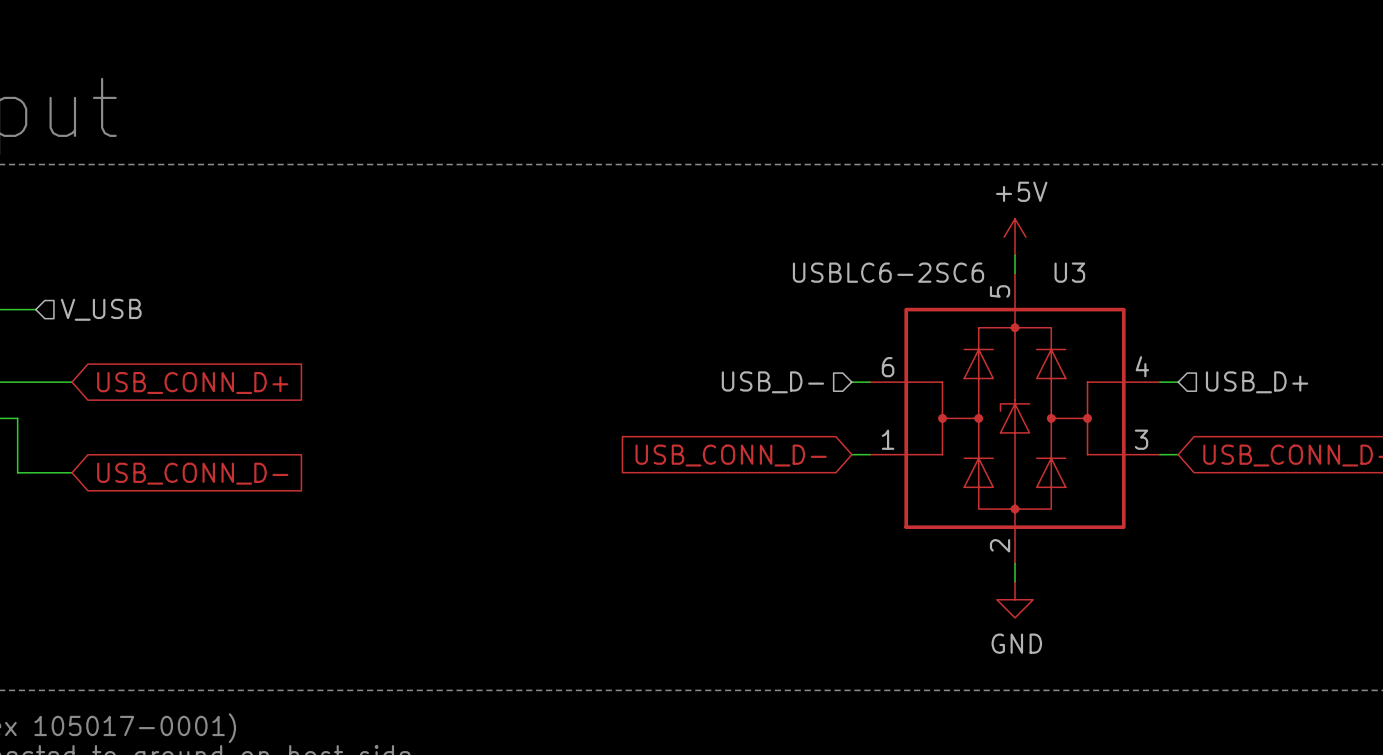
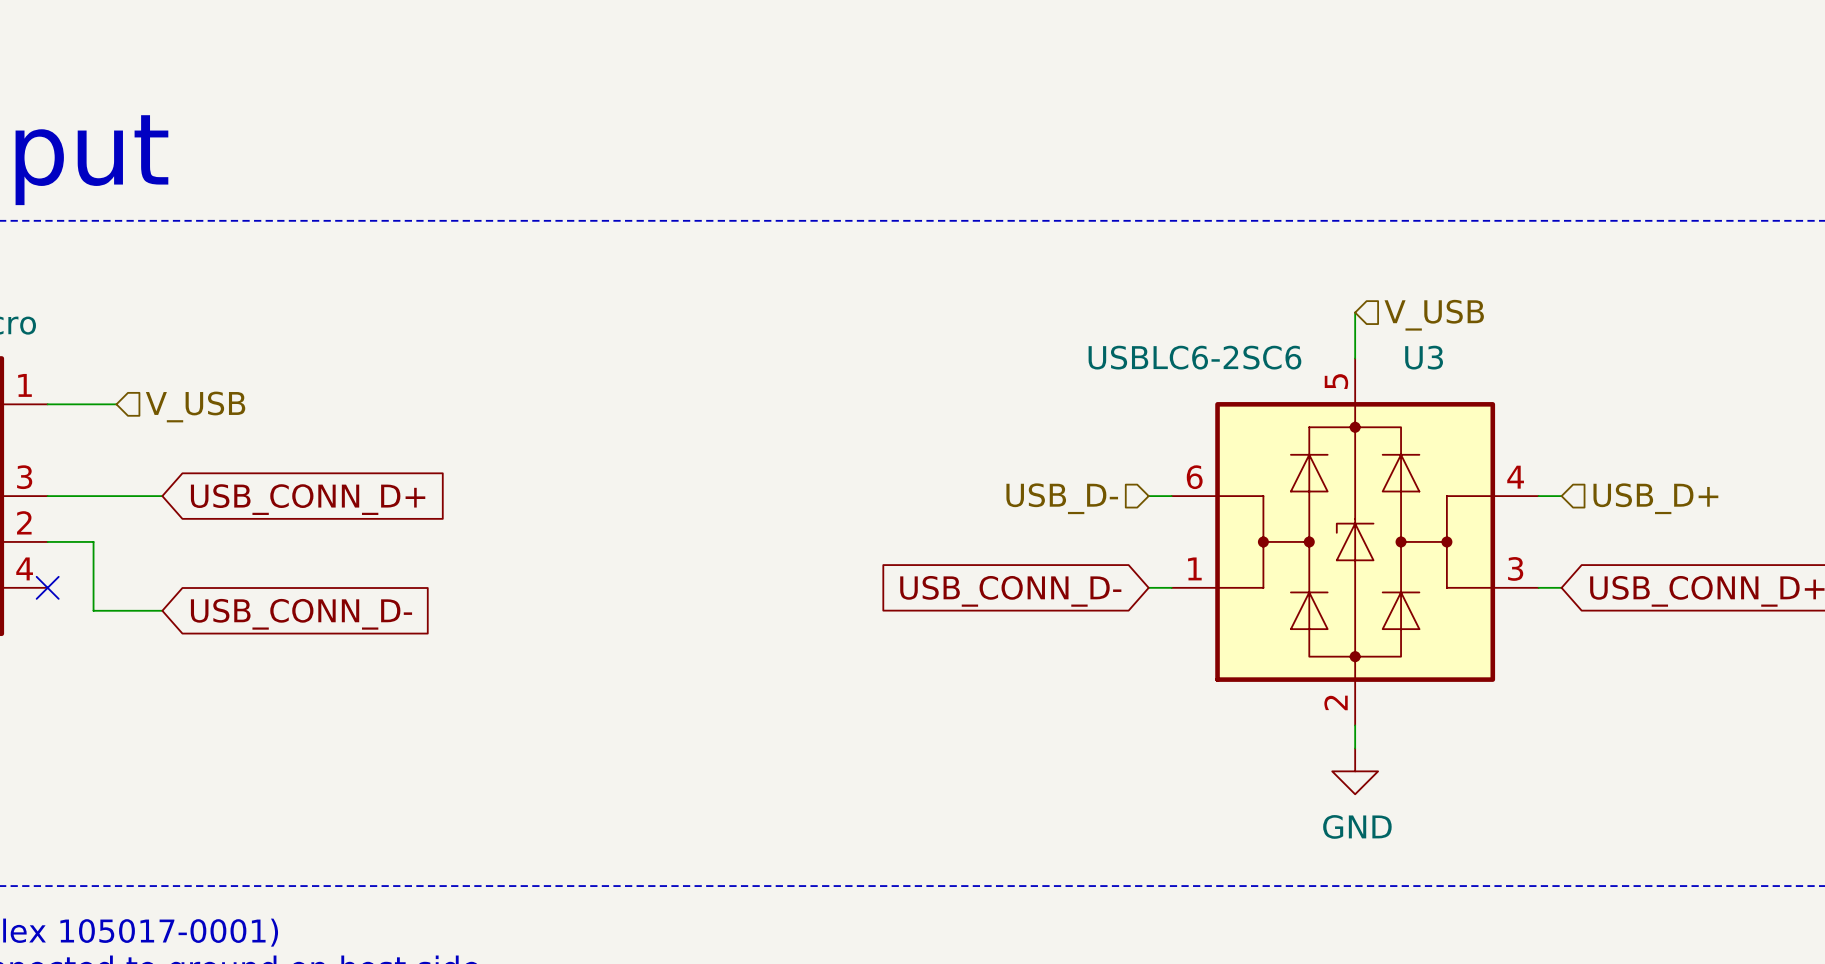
power symbol: +5V (1015, 237) -> none
hierarchical label: none -> V_USB (1434, 315)

